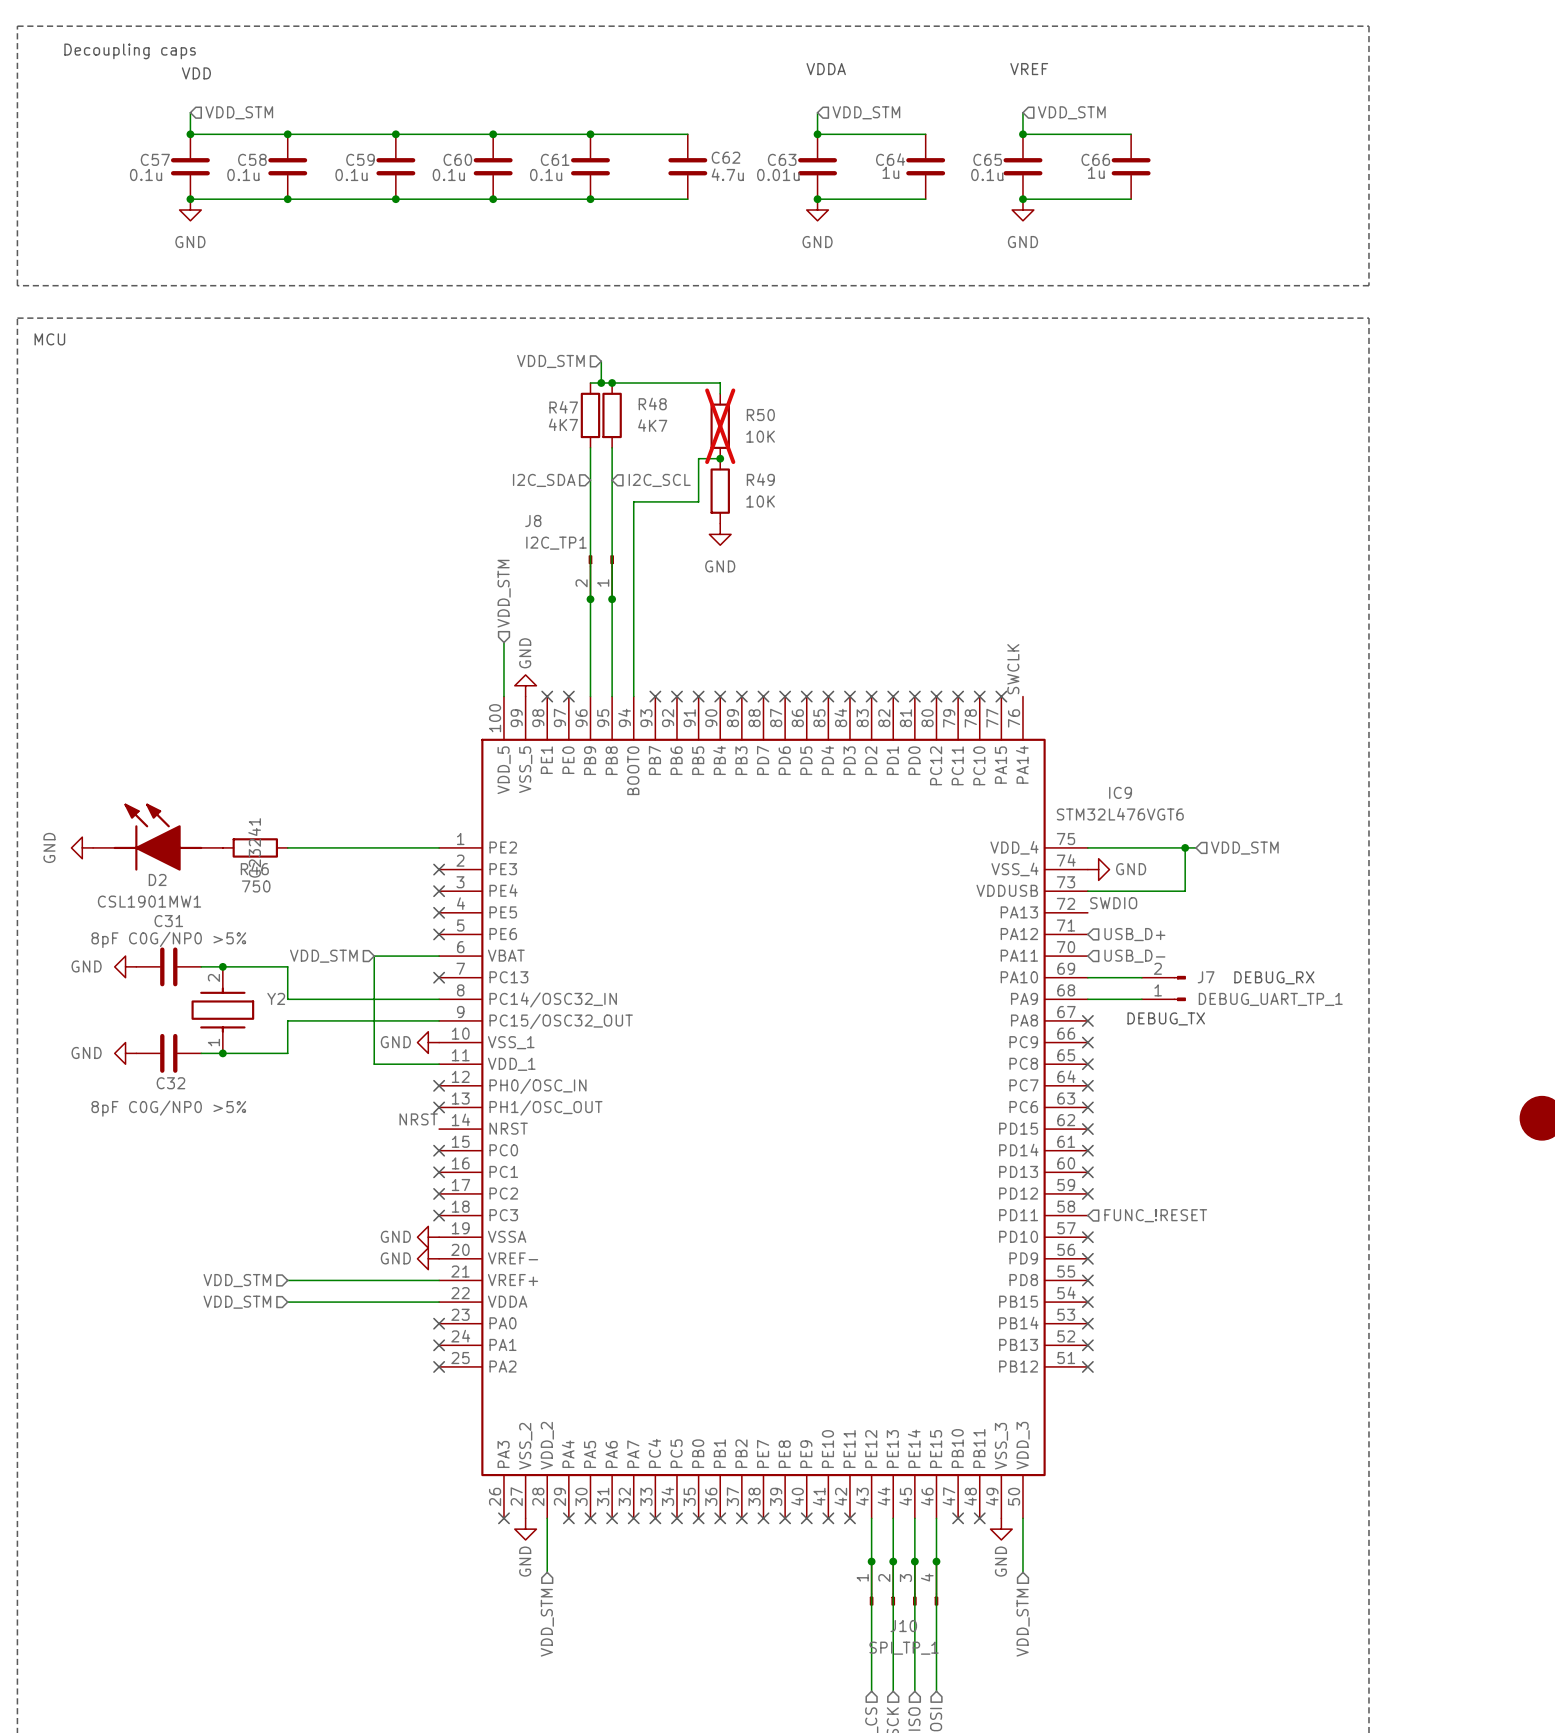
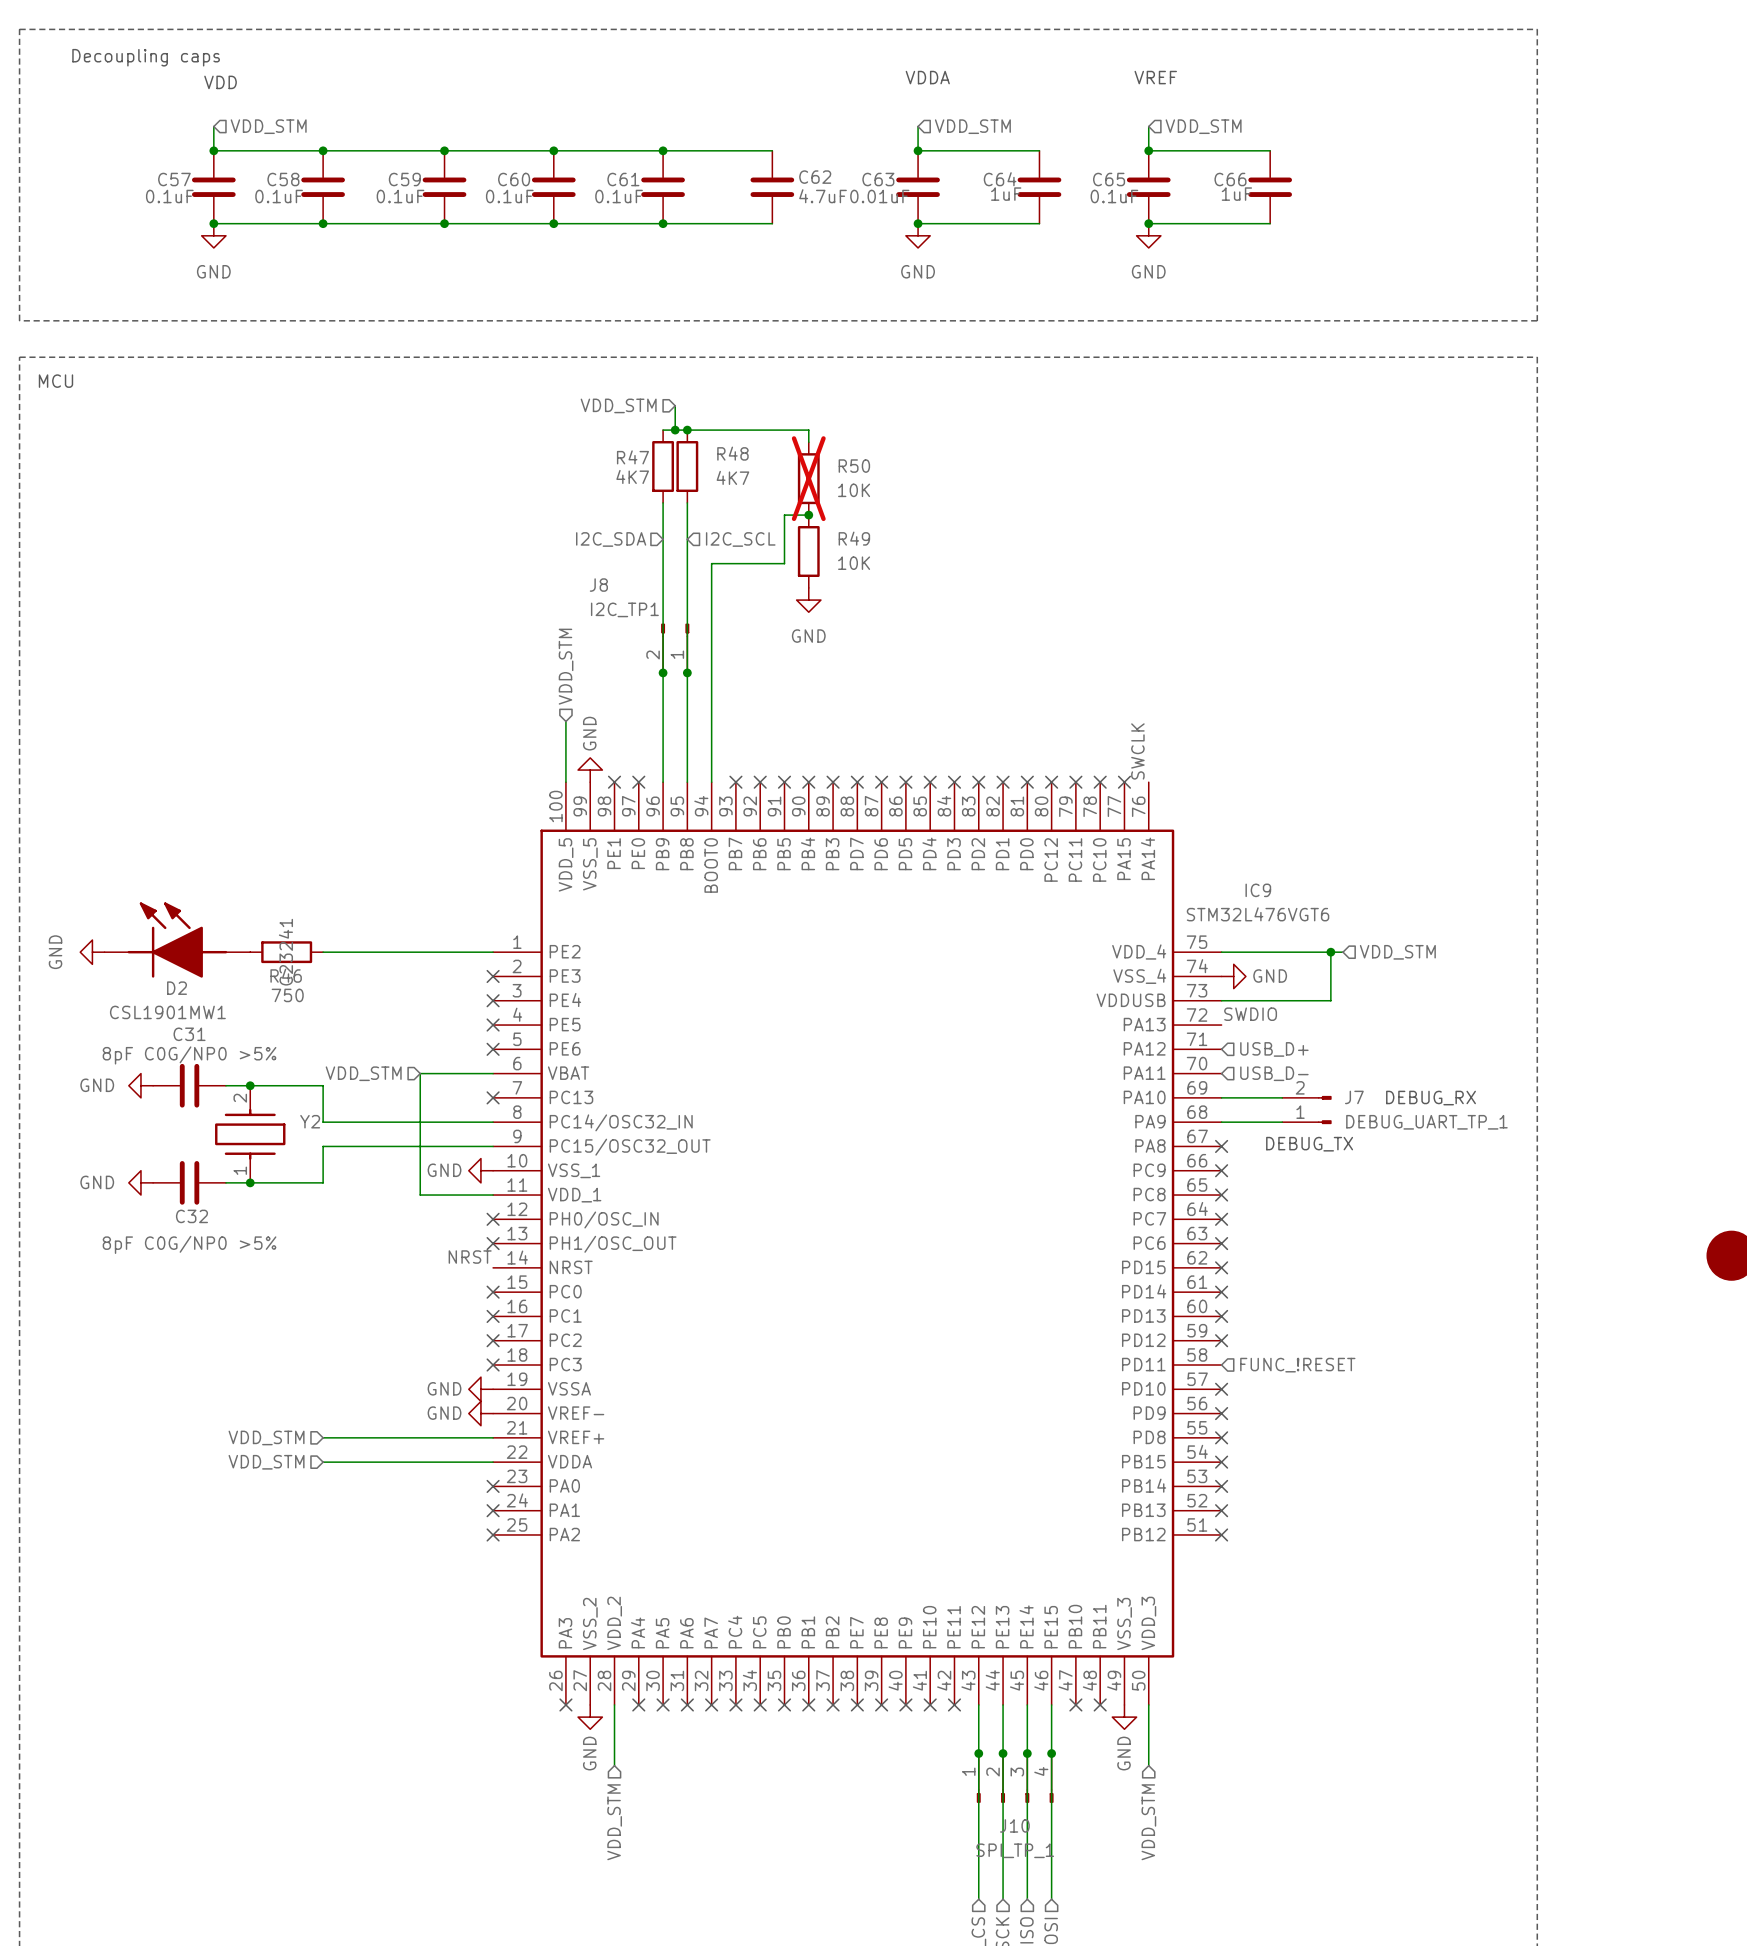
C64 value: 1u (890, 172) -> 1uF (1006, 194)
C66 value: 1u (1096, 172) -> 1uF (1236, 194)
C57 value: 0.1u (146, 174) -> 0.1uF (169, 196)
C58 value: 0.1u (243, 174) -> 0.1uF (279, 196)
C59 value: 0.1u (351, 174) -> 0.1uF (400, 196)
C60 value: 0.1u (448, 174) -> 0.1uF (509, 196)
C61 value: 0.1u (546, 174) -> 0.1uF (619, 196)
C62 value: 4.7u (727, 174) -> 4.7uF (823, 196)
C63 value: 0.01u (778, 174) -> 0.01uF (879, 196)
C65 value: 0.1u (987, 174) -> 0.1uF (1114, 196)

